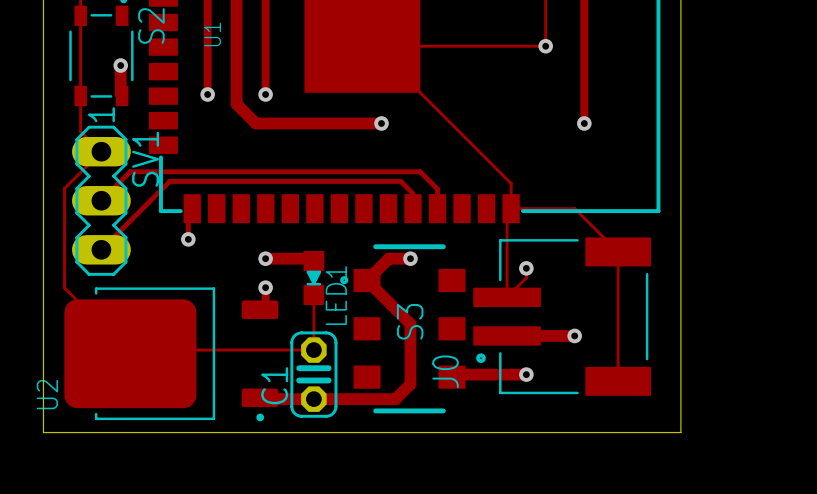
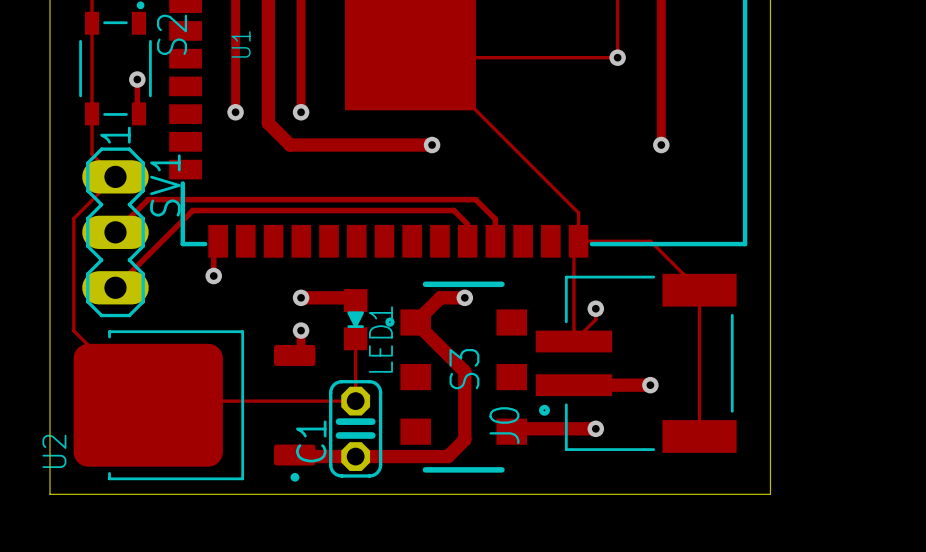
track width: thick (120, 65) (120, 94) -> thin (137, 79) (137, 112)

